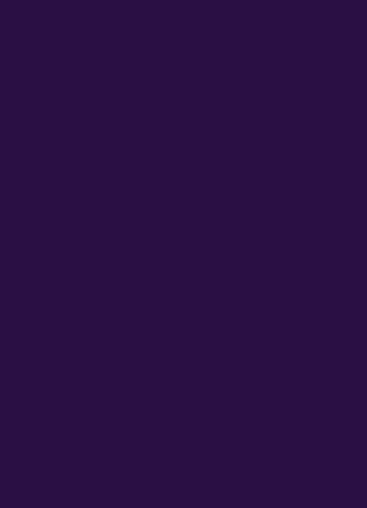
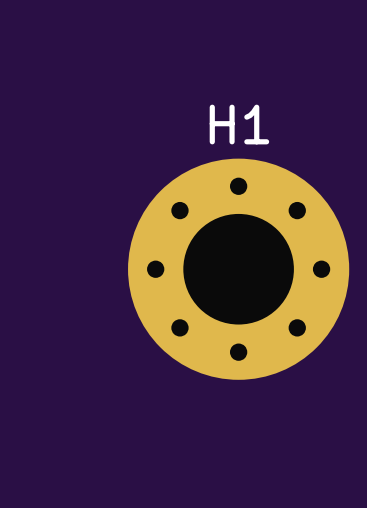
H1: none -> (238, 269)

